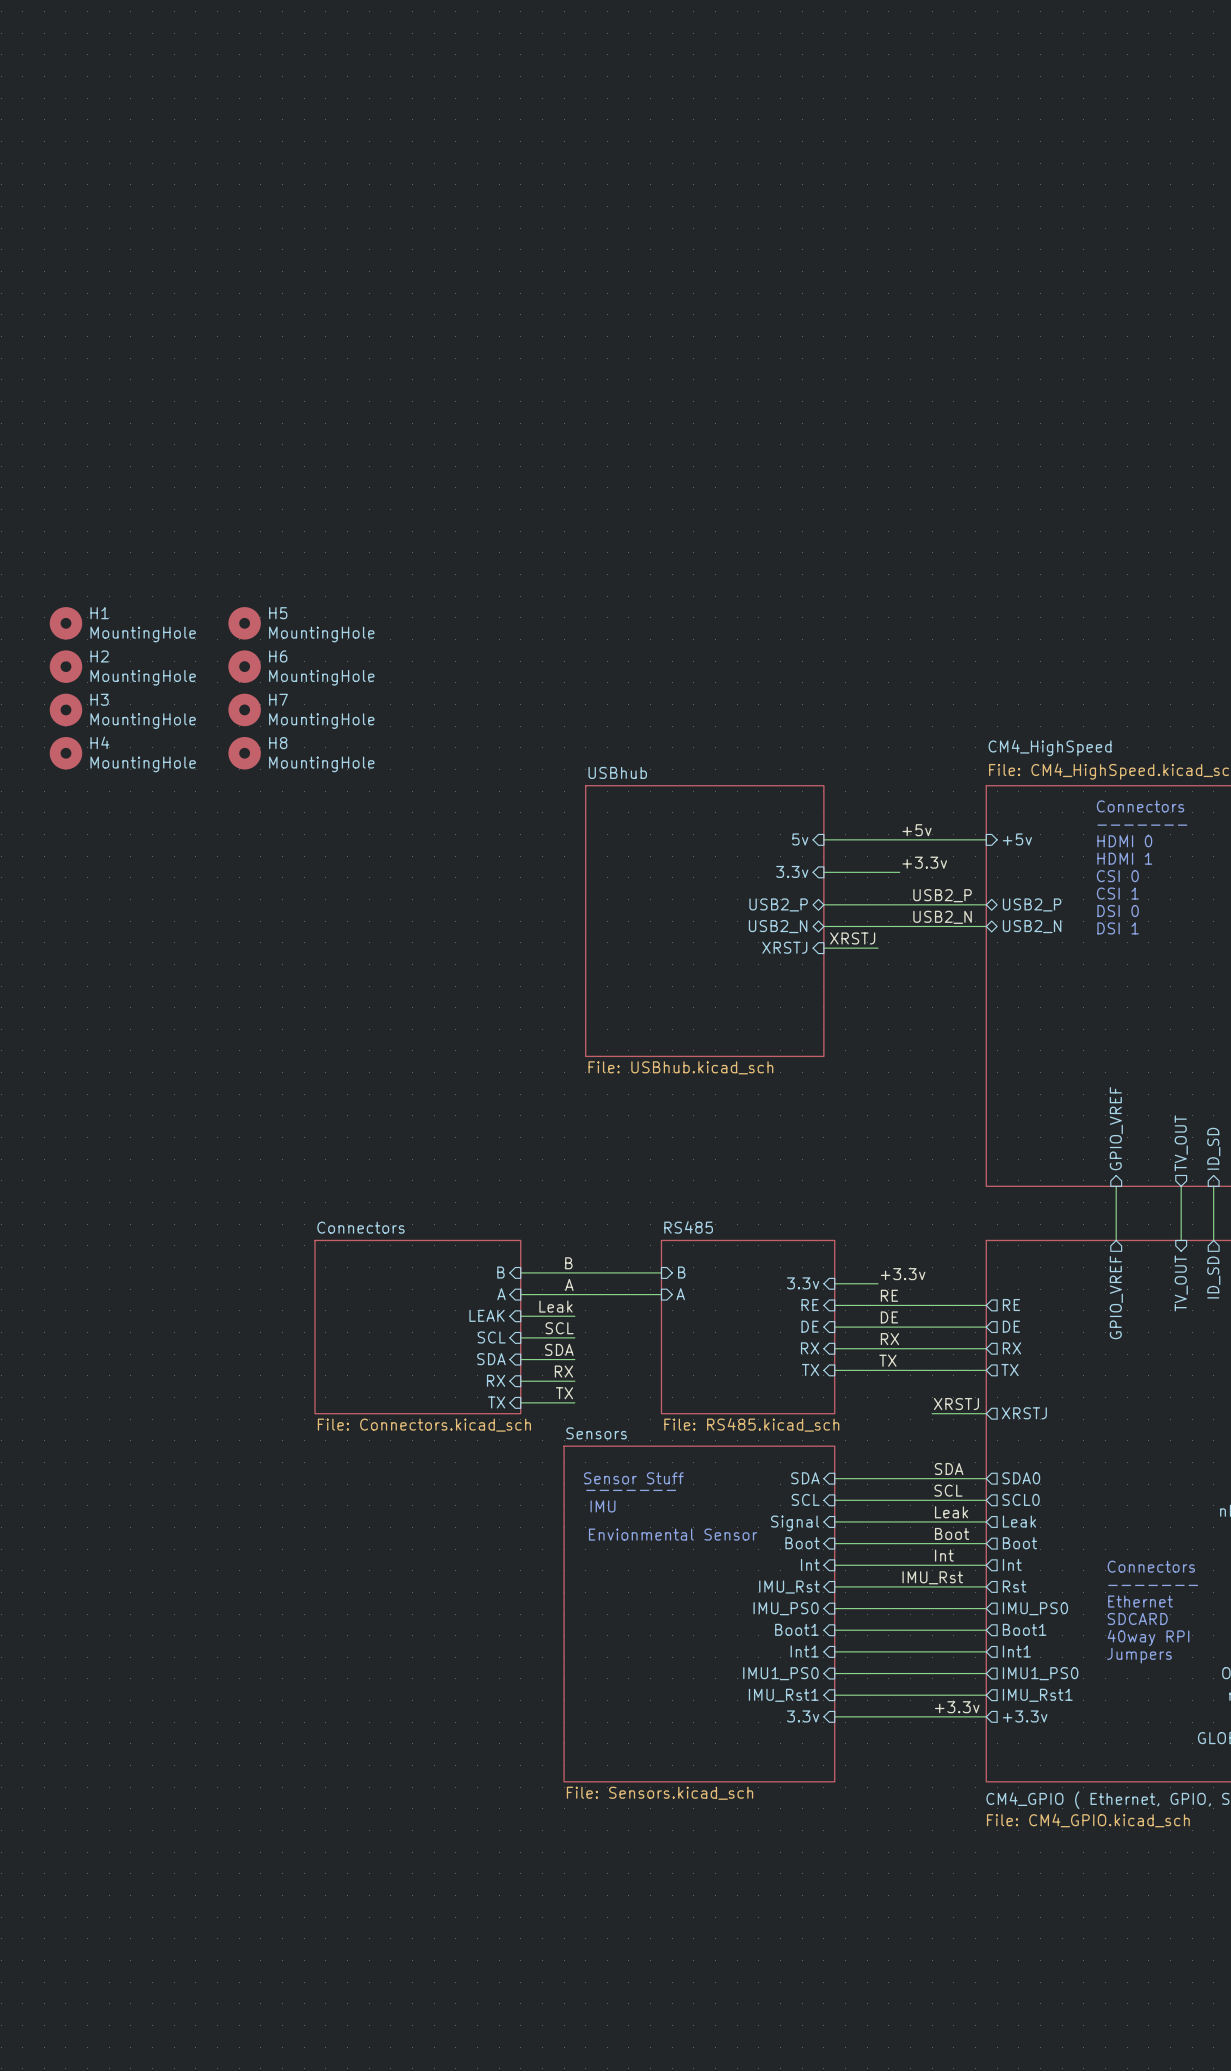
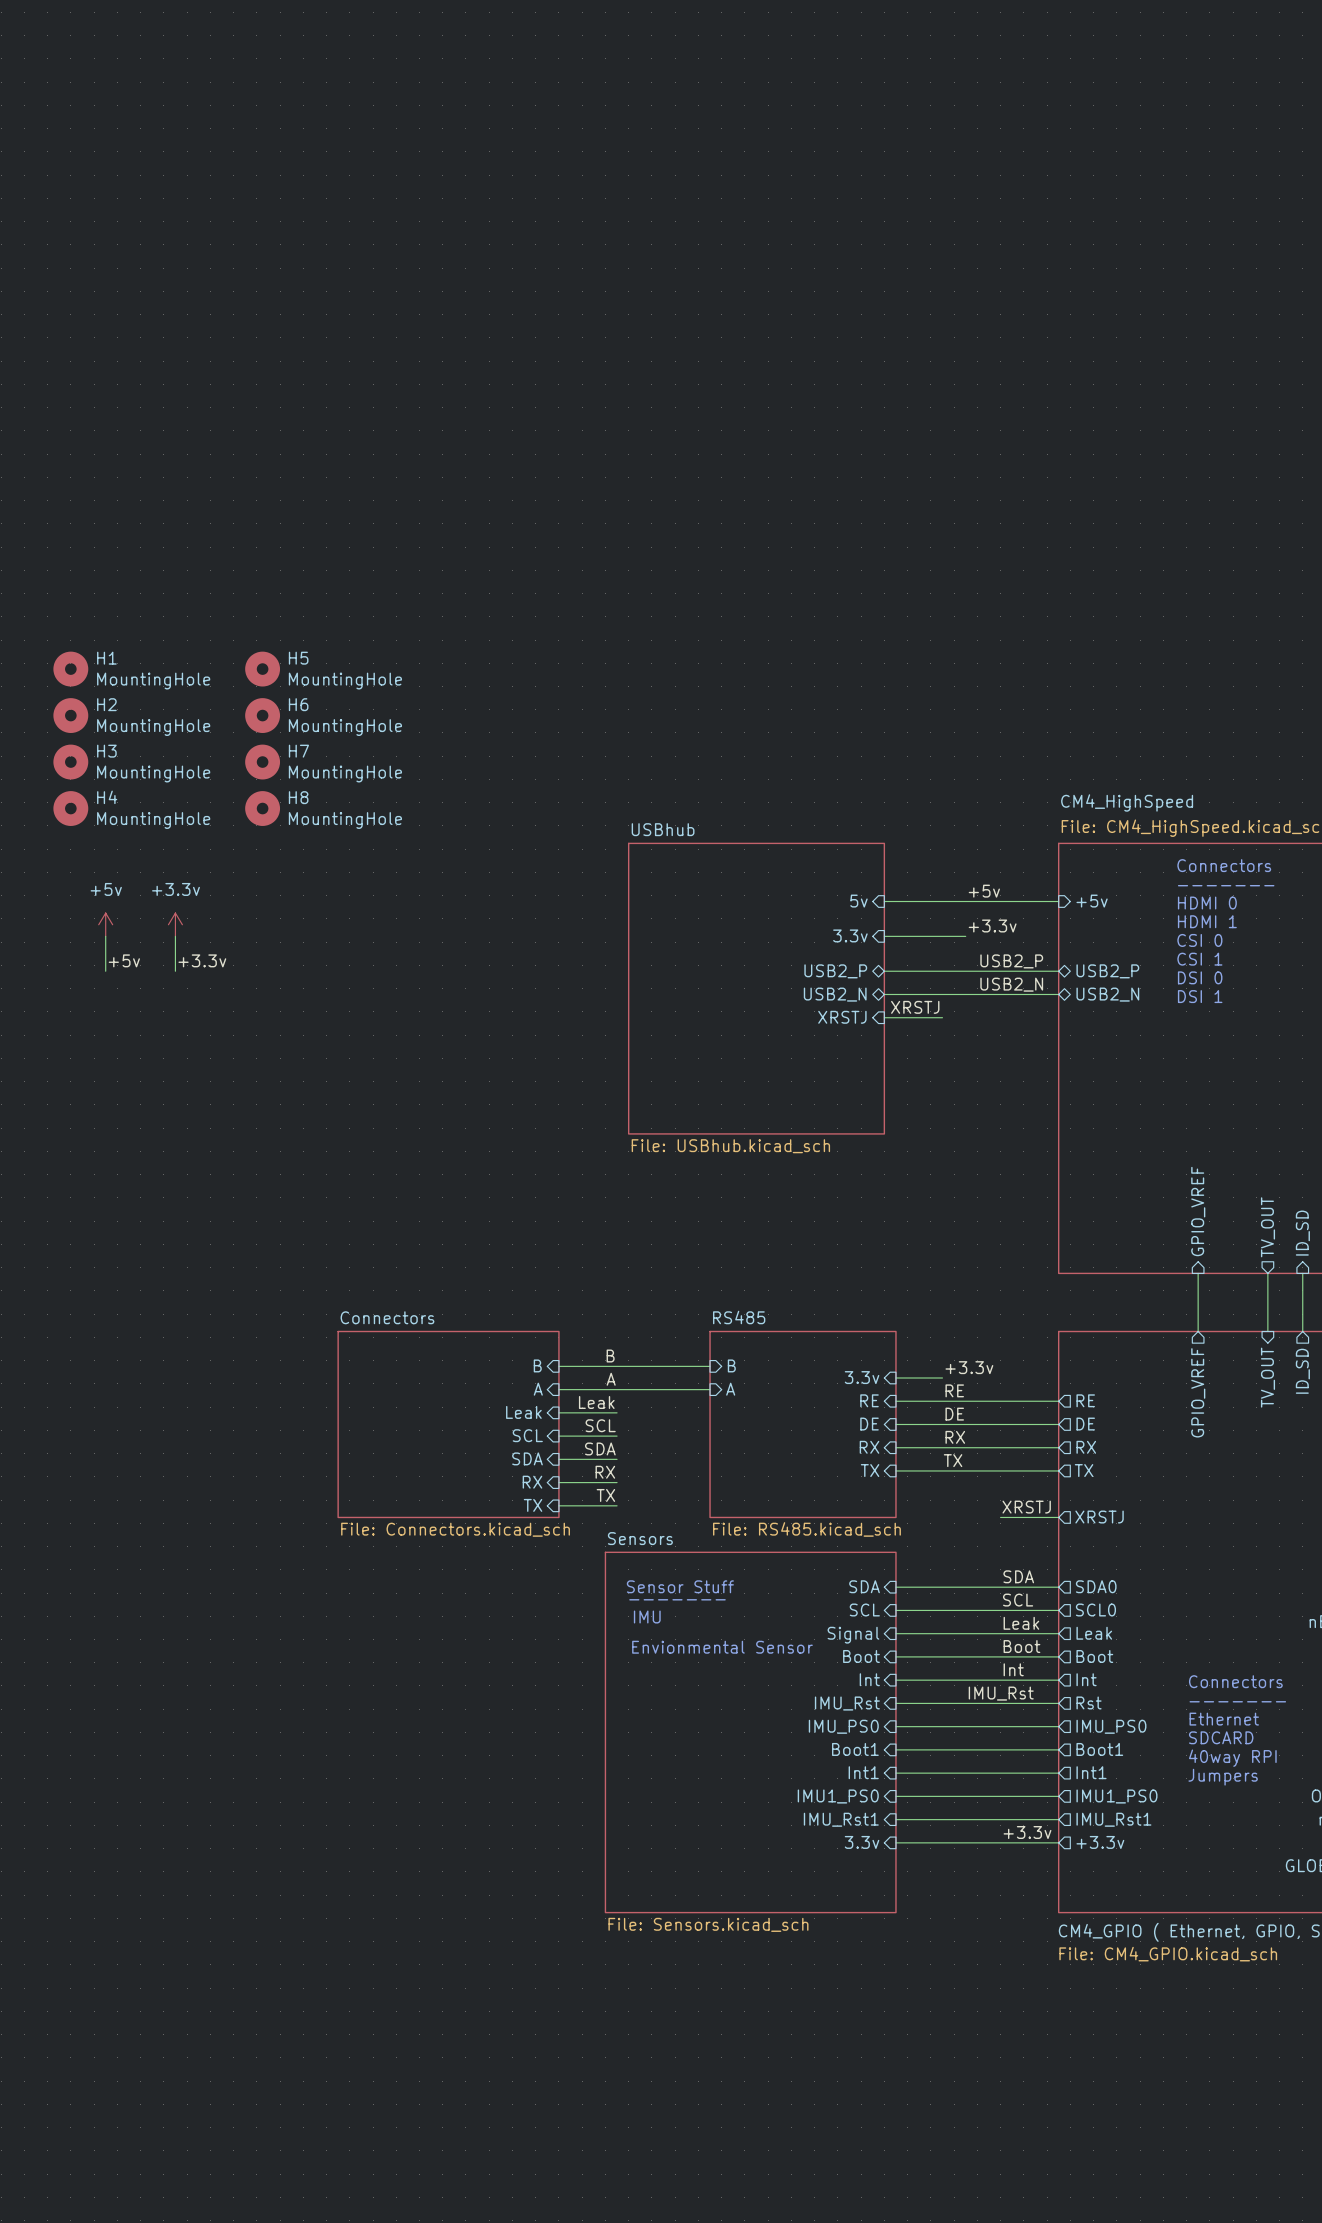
power symbol: none -> +5v (105, 924)
power symbol: none -> +3.3v (175, 924)
wire: none -> (105, 936) (105, 971)
wire: none -> (175, 936) (175, 971)
label: none -> +5v (124, 960)
label: none -> +3.3v (202, 960)
sheet pin: LEAK (487, 1315) -> Leak (523, 1412)

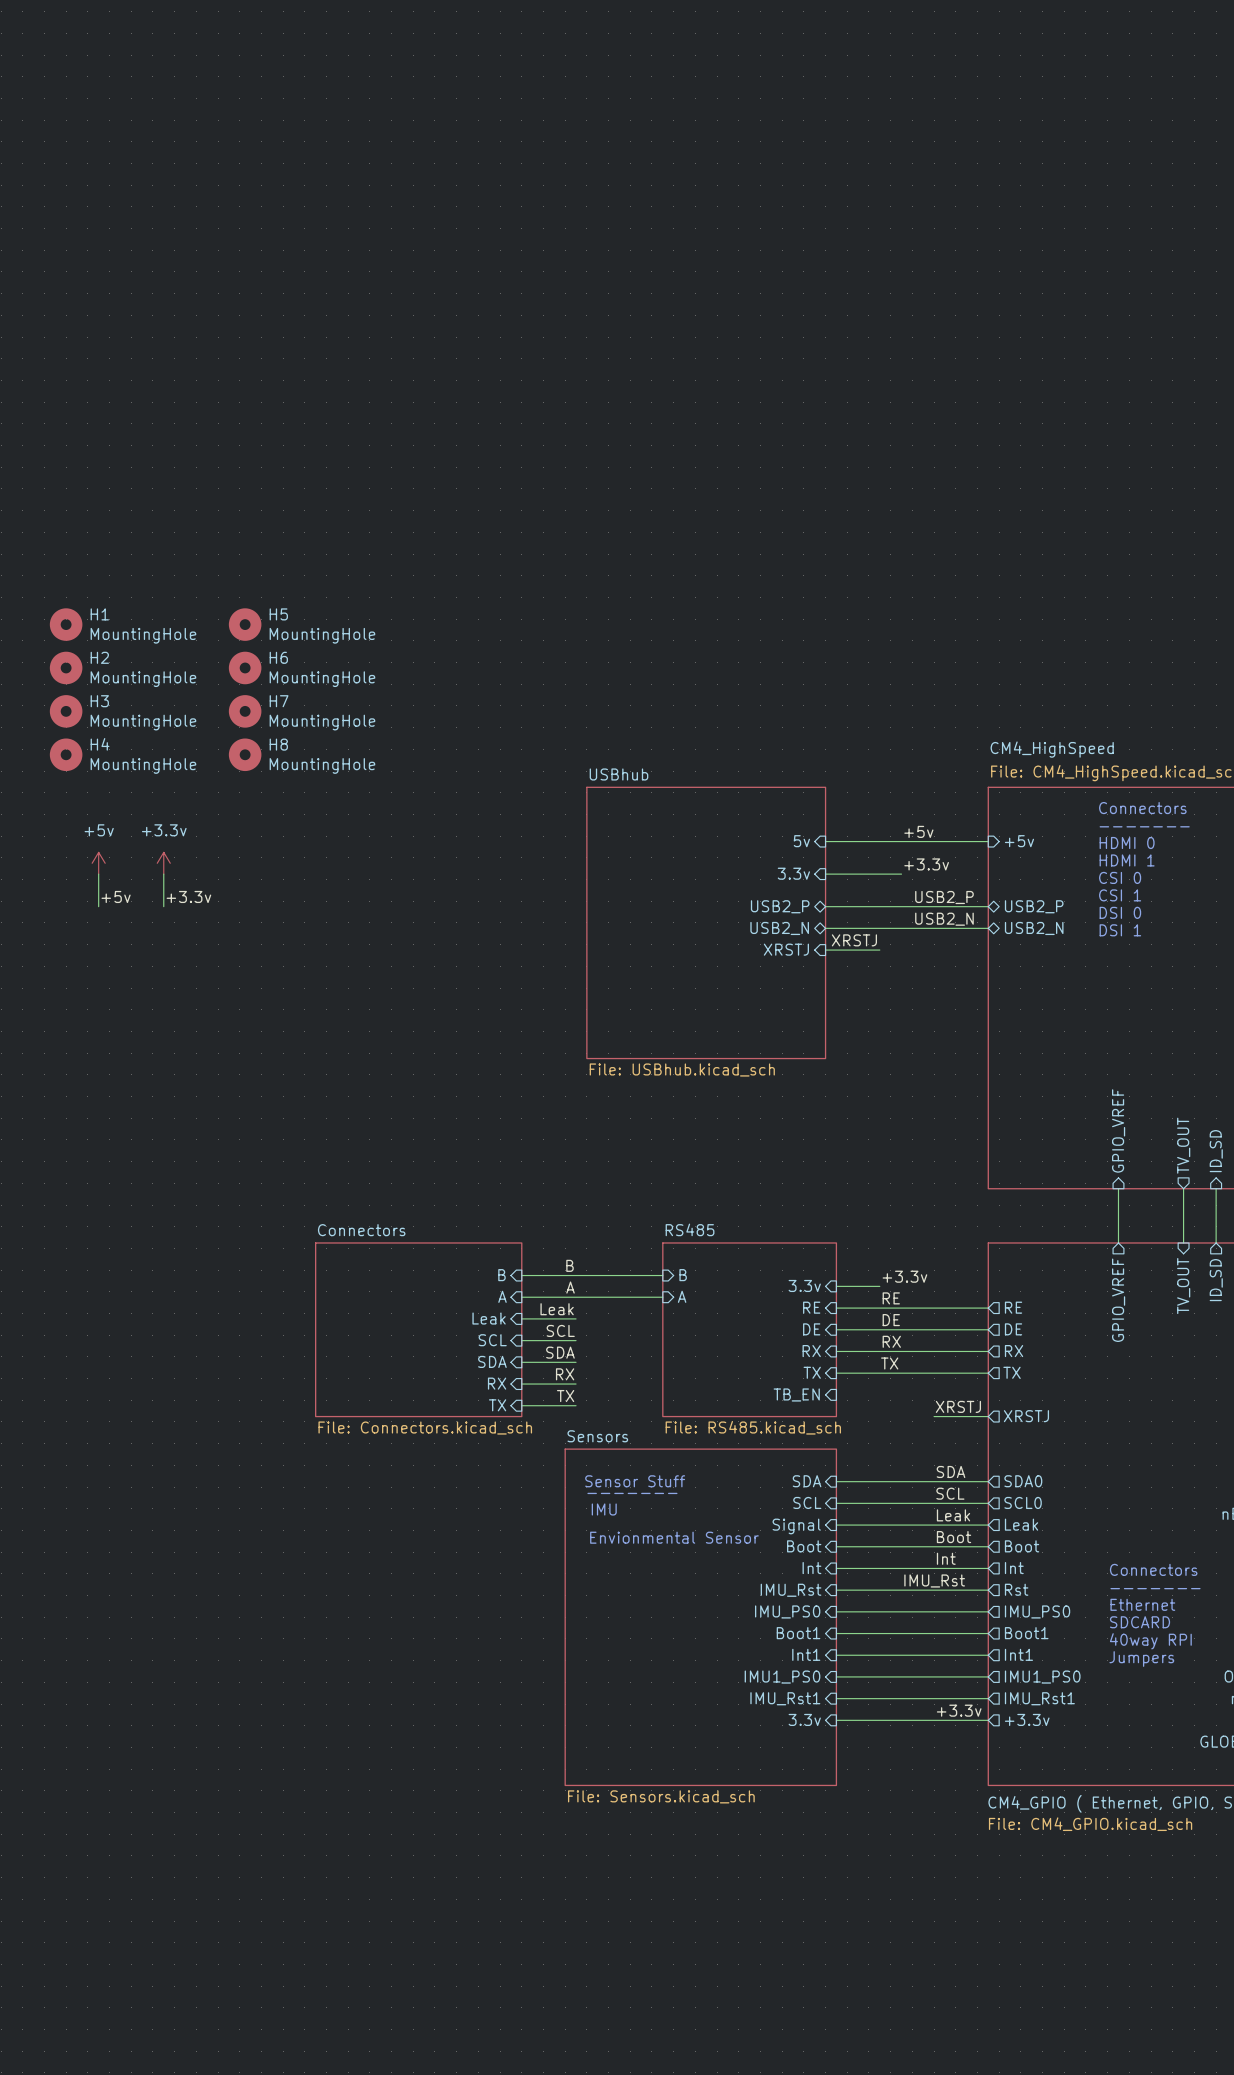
sheet pin: none -> TB_EN (796, 1394)

